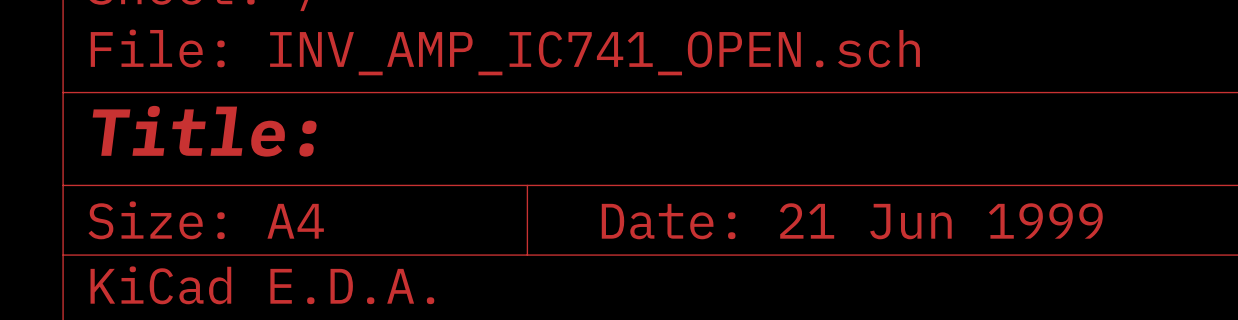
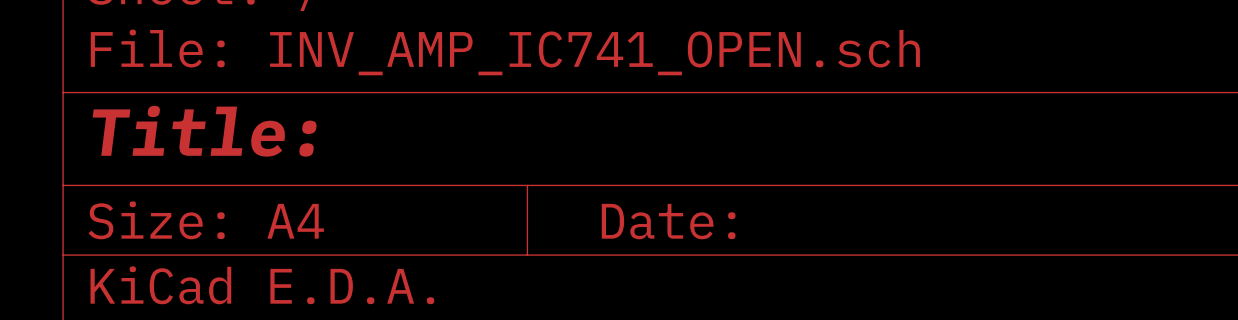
title block: Date: 21 Jun 1999 (852, 221) -> Date: (668, 221)

